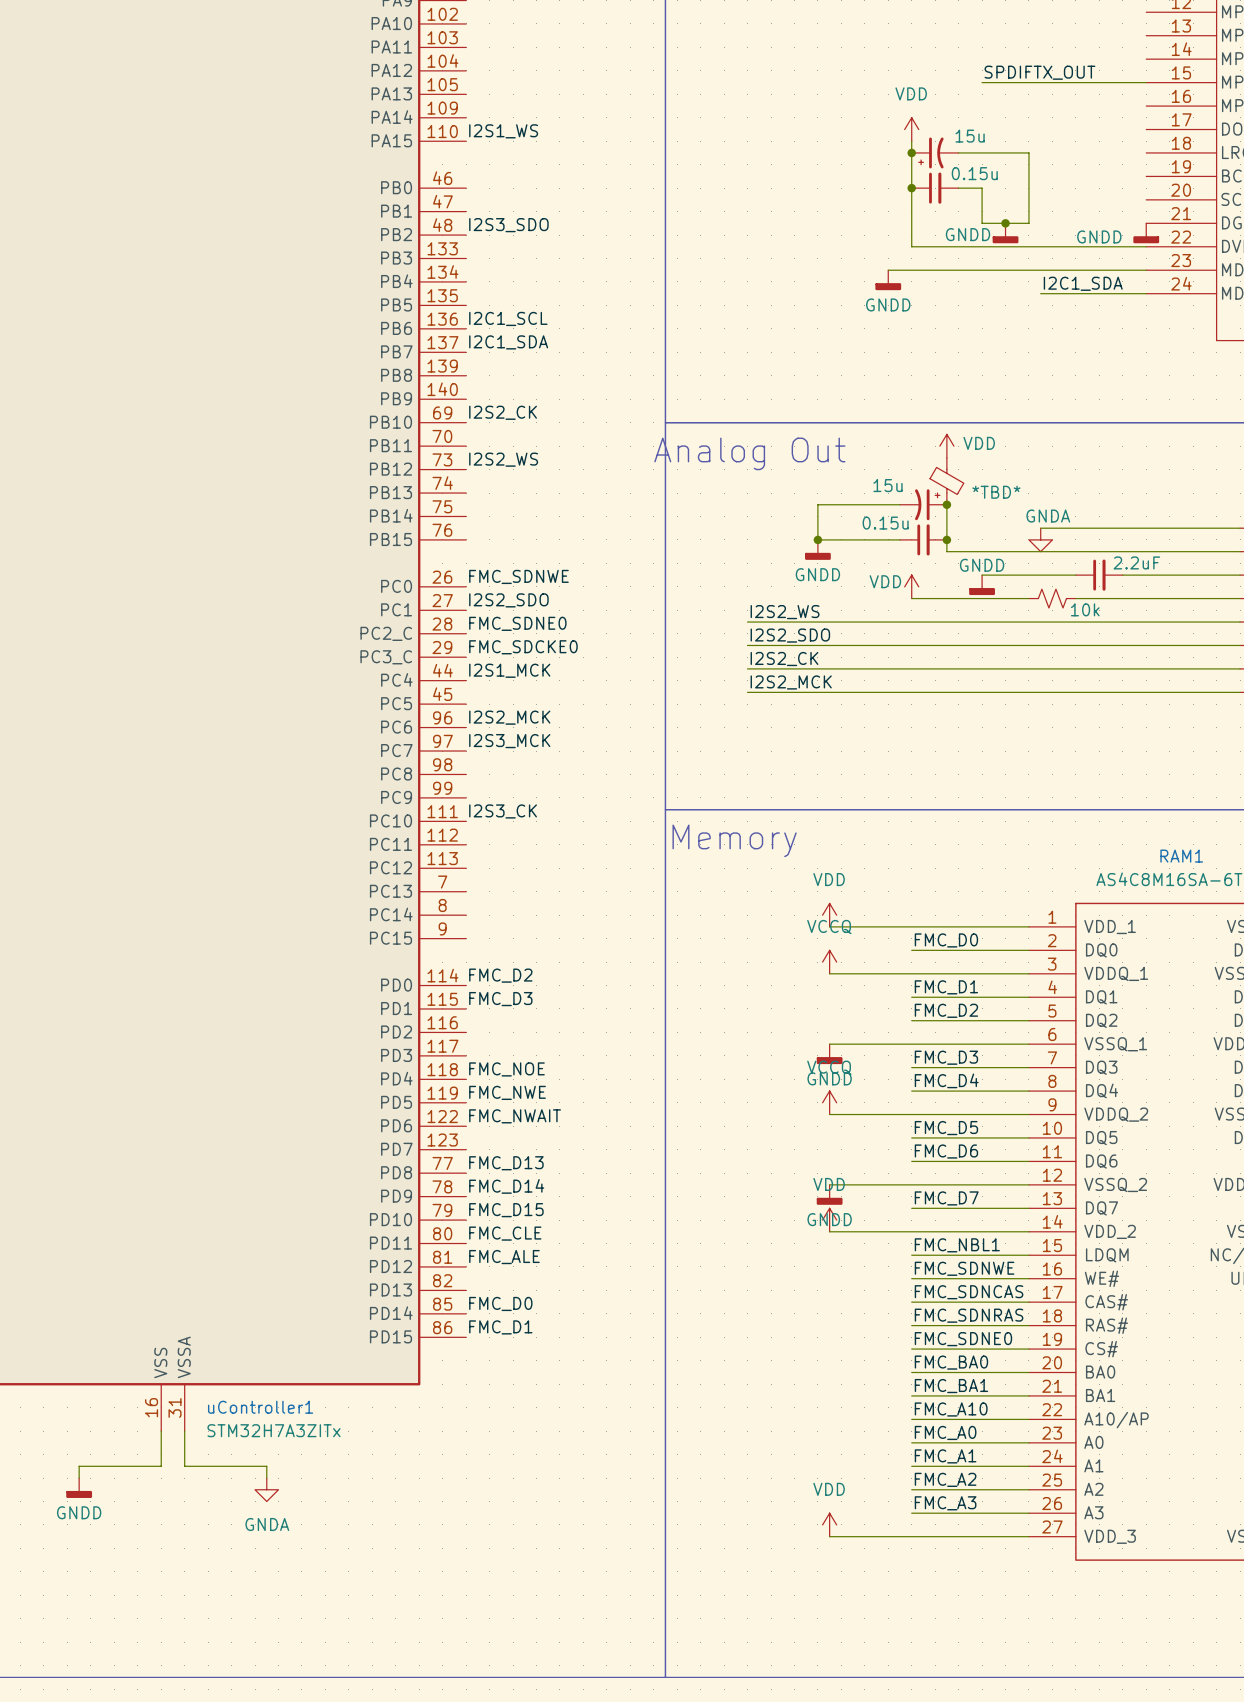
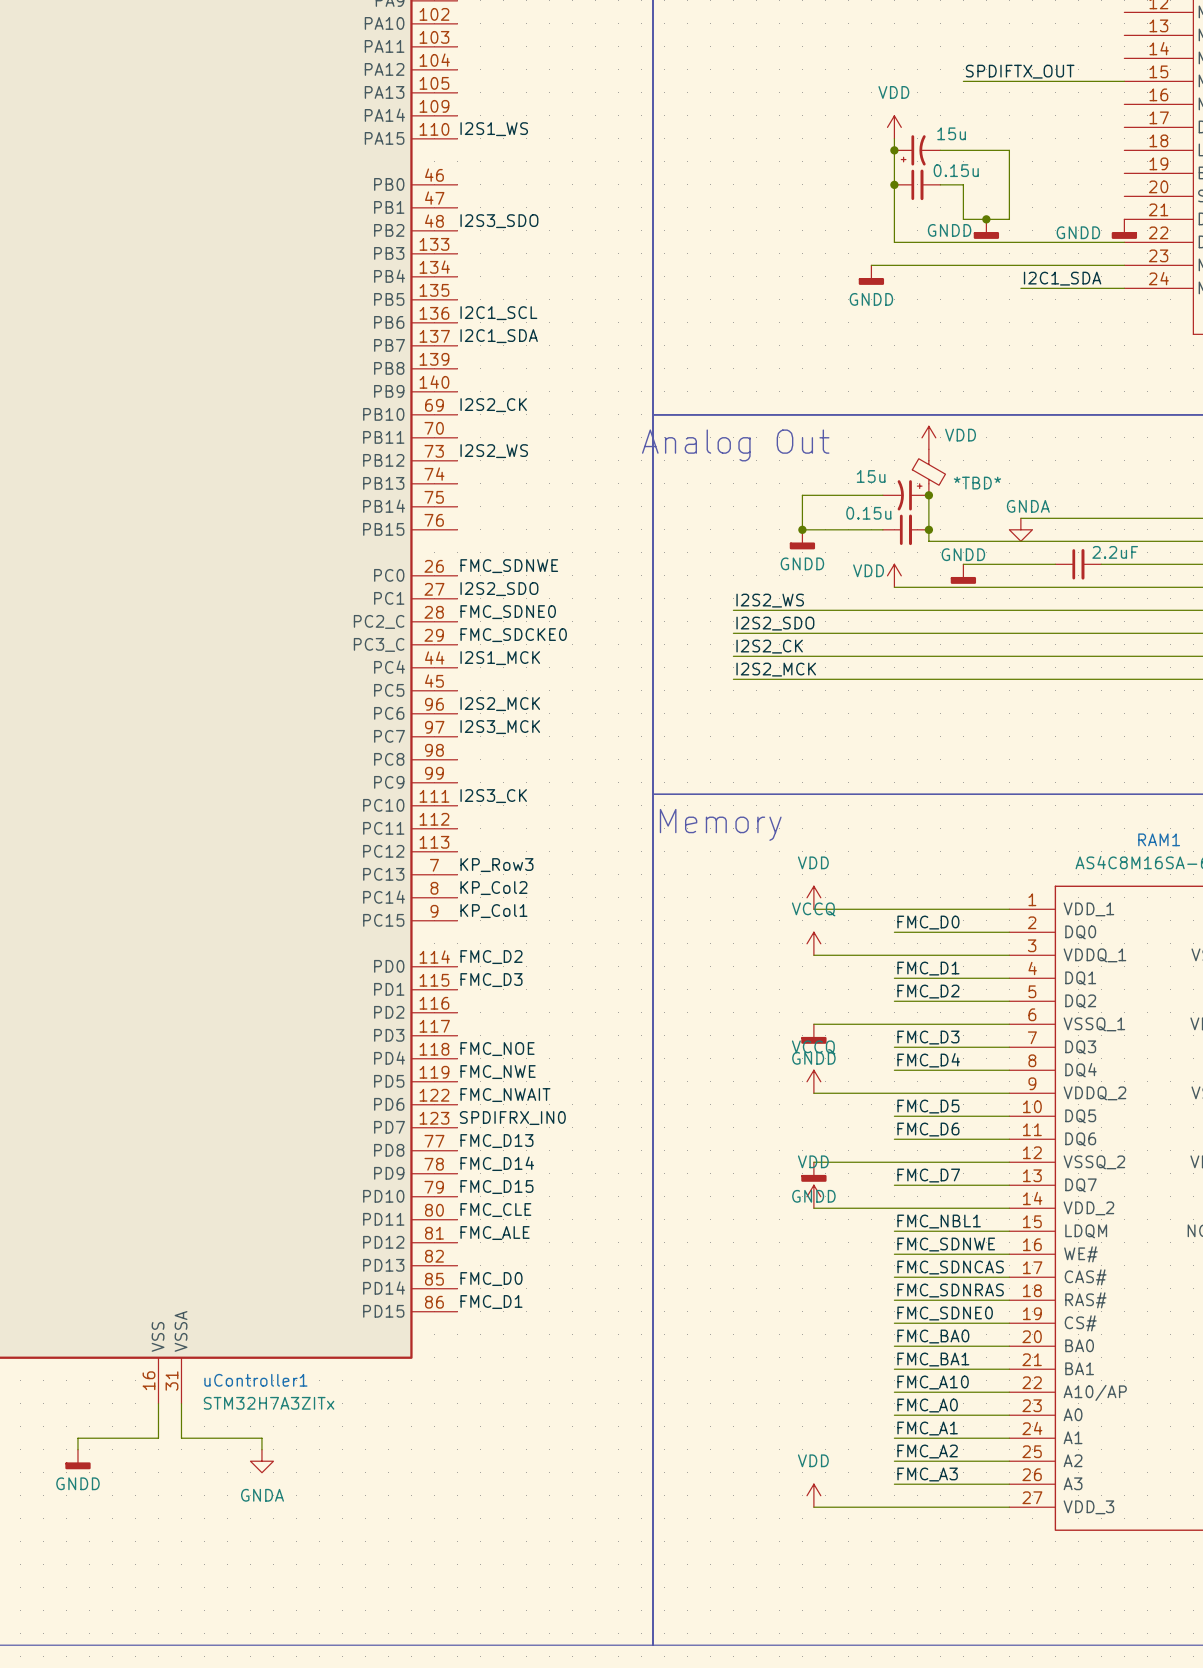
part: 10k (1052, 598) -> none
label: none -> KP_Row3 (496, 865)
label: none -> KP_Col2 (493, 888)
label: none -> KP_Col1 (493, 911)
label: none -> SPDIFRX_IN0 (512, 1118)

